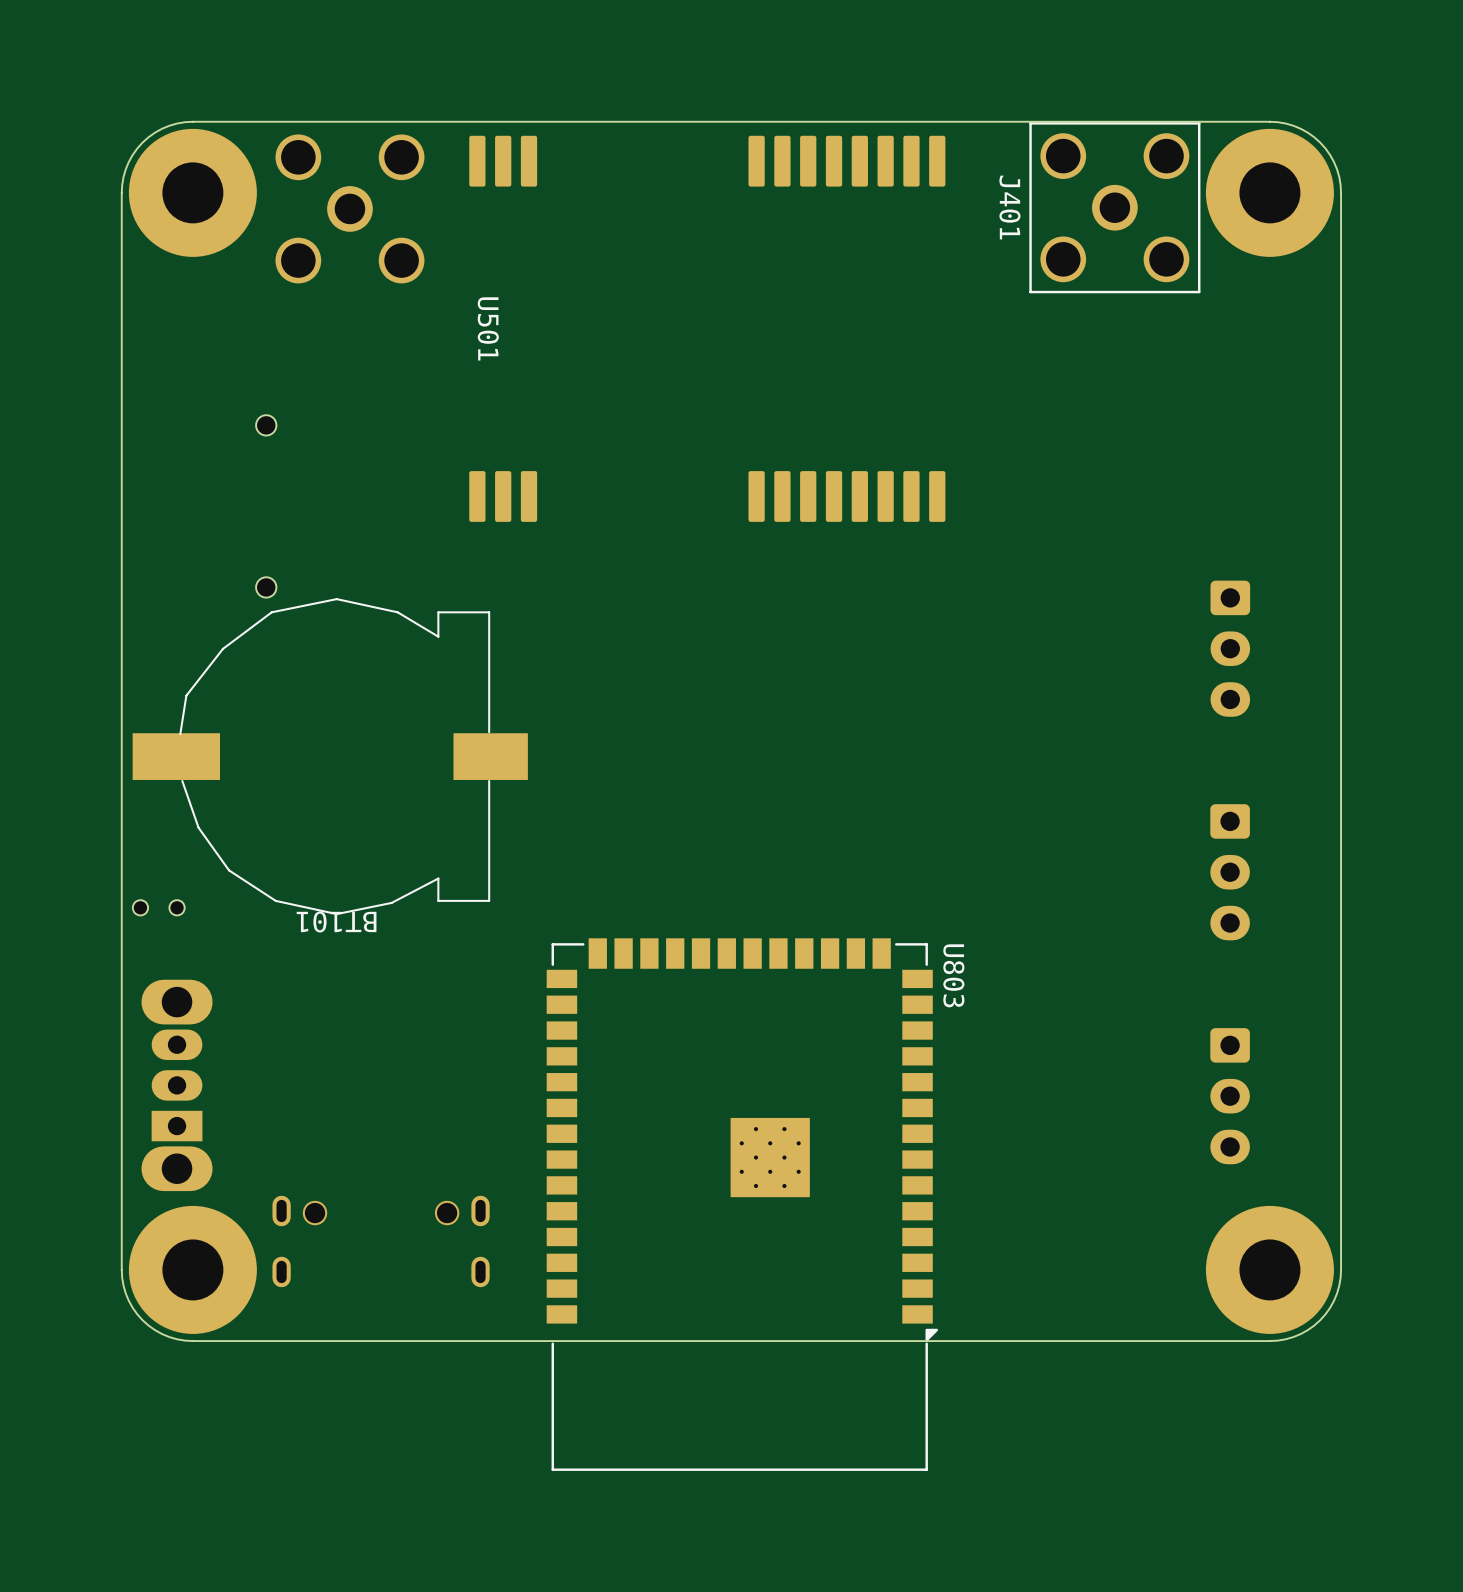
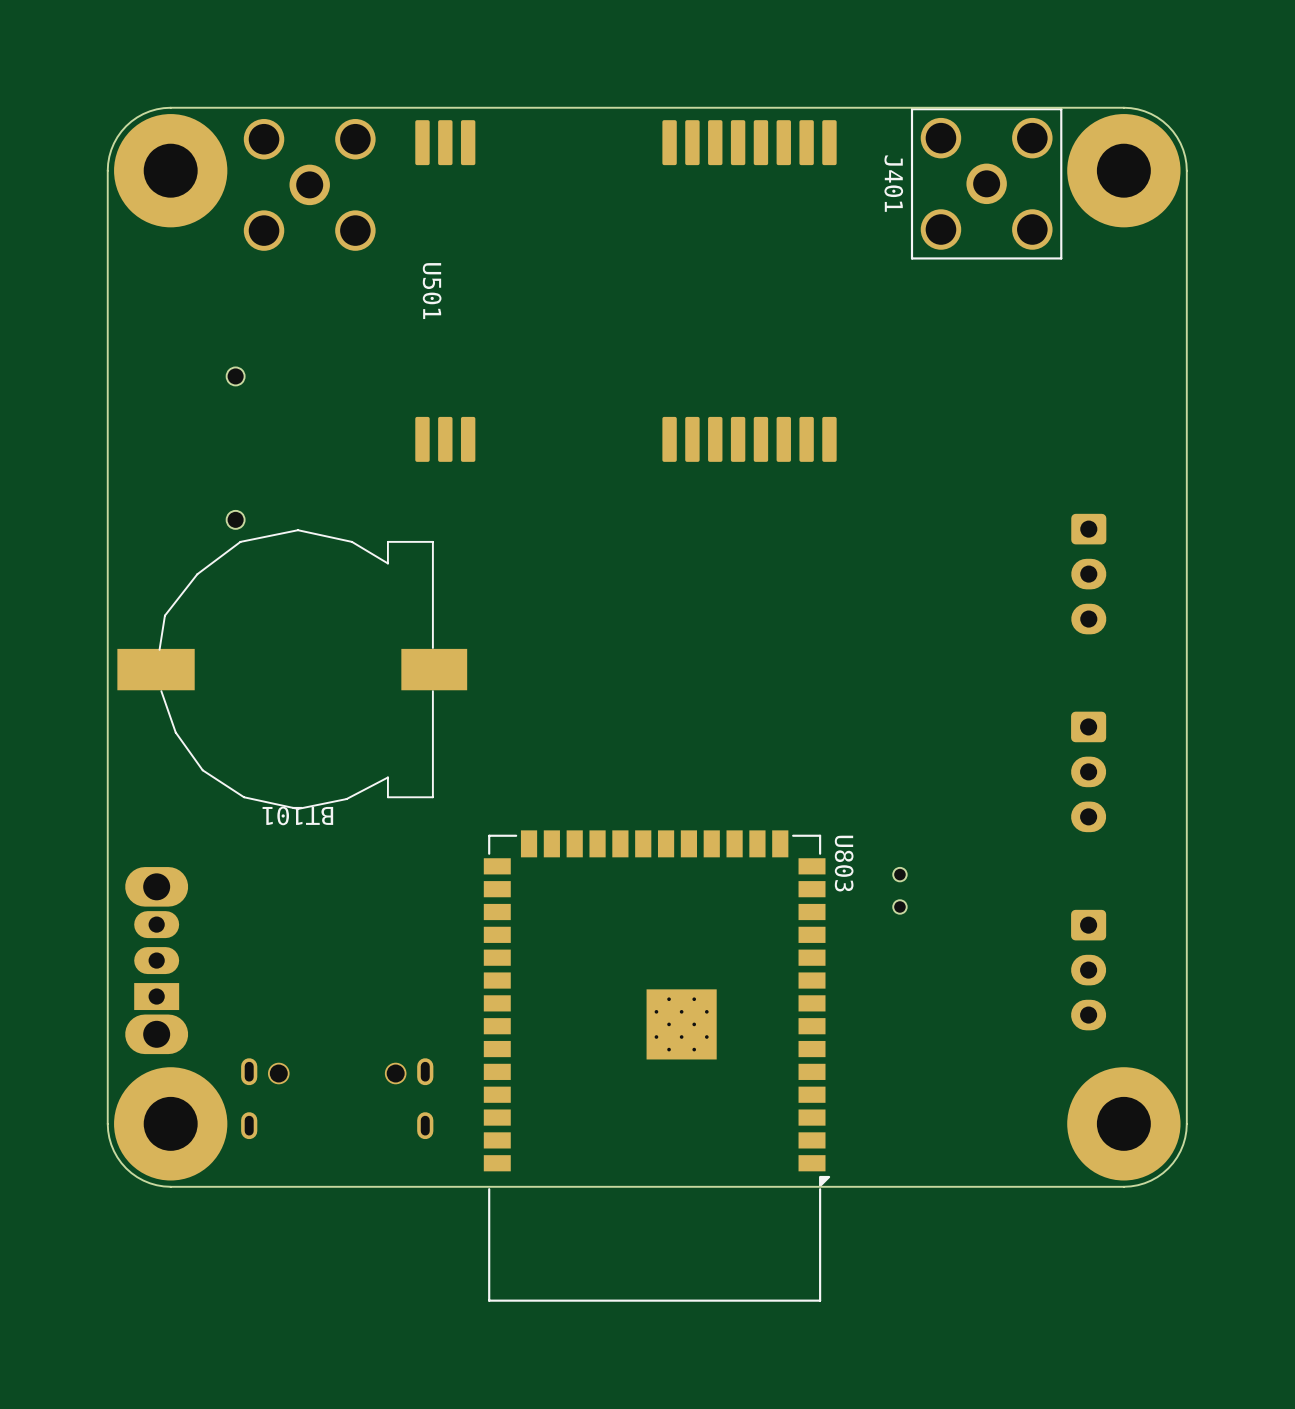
part: (158, 907) -> none
part: none -> (899, 890)

